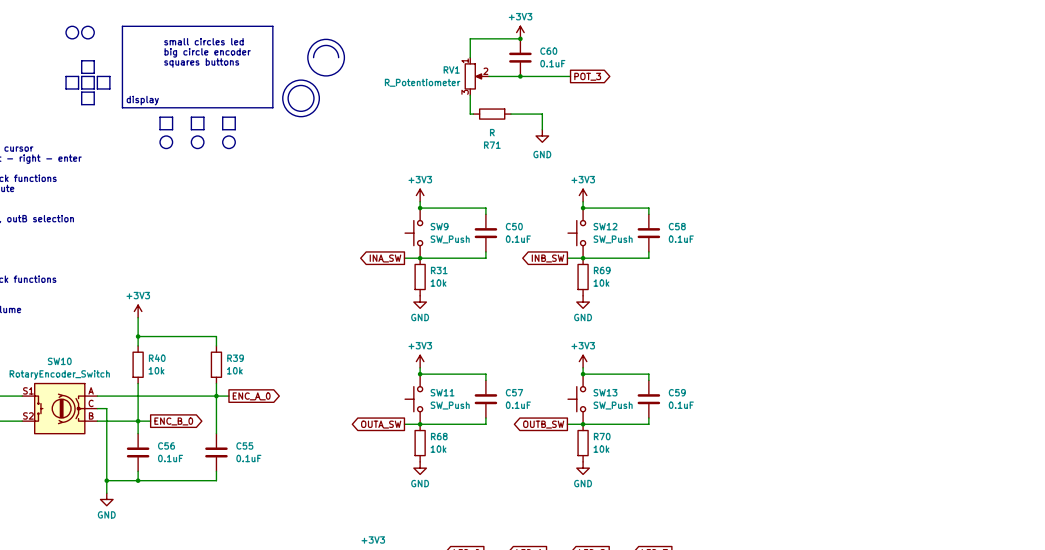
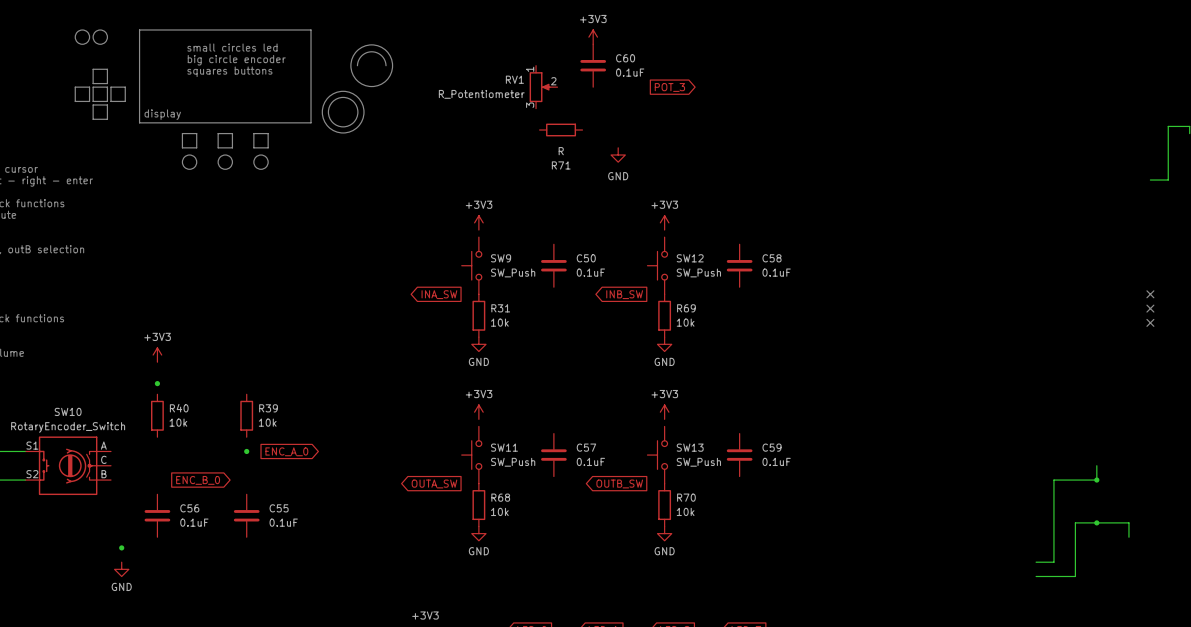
wire: (520, 38) (470, 38) (470, 57) -> none
junction: (520, 38) -> none
wire: (489, 76) (570, 76) -> none
junction: (520, 76) -> none
wire: (470, 95) (470, 114) (473, 114) -> none
wire: (511, 114) (542, 114) (542, 129) -> none
wire: none -> (1189, 133) (1189, 126) (1168, 126) (1168, 180) (1150, 180)
wire: (420, 201) (420, 208) (485, 208) (485, 214) -> none
wire: (583, 201) (583, 208) (648, 208) (648, 214) -> none
junction: (420, 208) -> none
junction: (583, 208) -> none
wire: (485, 251) (485, 258) (404, 258) -> none
wire: (648, 251) (648, 258) (567, 258) -> none
junction: (420, 258) -> none
junction: (583, 258) -> none
no-connect mark: none -> (1150, 294)
no-connect mark: none -> (1150, 308)
no-connect mark: none -> (1150, 322)
wire: (138, 317) (138, 345) -> none
wire: (138, 336) (216, 336) (216, 345) -> none
wire: (420, 367) (420, 374) (485, 374) (485, 380) -> none
wire: (583, 367) (583, 374) (648, 374) (648, 380) -> none
junction: (420, 374) -> none
junction: (583, 374) -> none
wire: (138, 383) (138, 433) -> none
wire: (216, 383) (216, 433) -> none
wire: (97, 396) (228, 396) -> none
wire: (97, 408) (106, 408) (106, 493) -> none
wire: none -> (1096, 465) (1096, 480) (1053, 480) (1053, 562) (1036, 562)
wire: (485, 418) (485, 424) (404, 424) -> none
wire: (648, 418) (648, 424) (567, 424) -> none
wire: (97, 421) (150, 421) -> none
junction: (138, 421) -> none
junction: none -> (1096, 480)
junction: (420, 424) -> none
junction: (583, 424) -> none
junction: none -> (1096, 522)
wire: (138, 471) (138, 480) -> none
wire: (216, 471) (216, 480) (106, 480) -> none
wire: none -> (1128, 537) (1128, 522) (1075, 522) (1075, 576) (1036, 576)
junction: (138, 480) -> none

